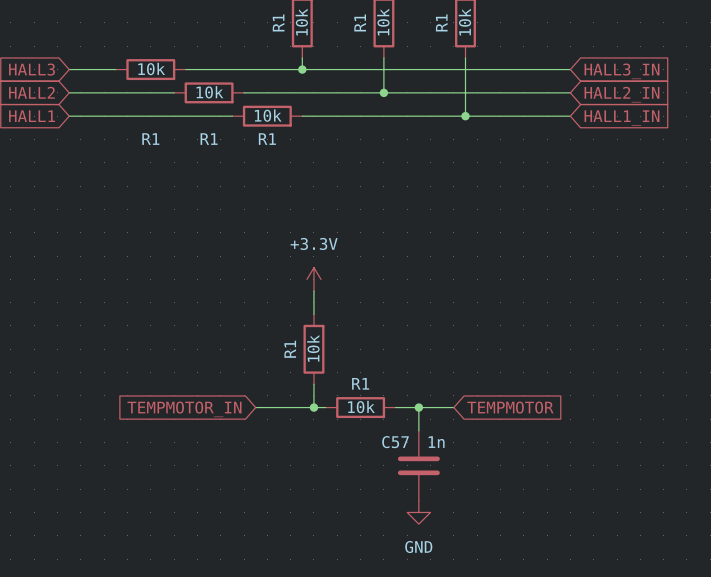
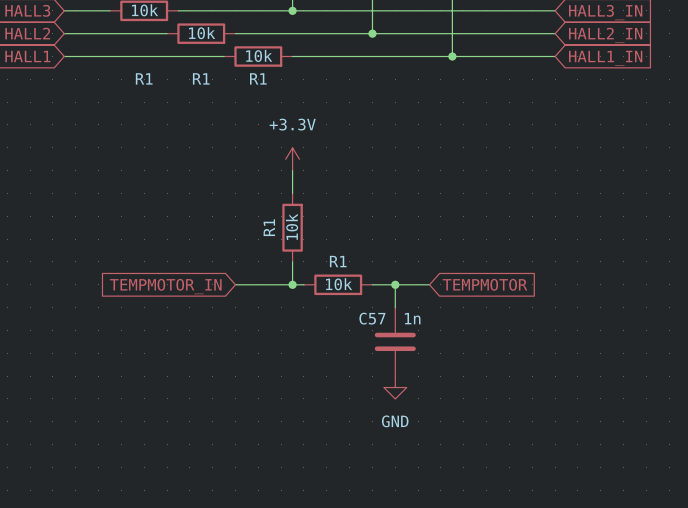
power symbol position: +3.3V (313, 279) -> +3.3V (292, 159)
R1: none -> 10k (292, 227)
wire: (313, 291) (313, 314) -> (292, 170) (292, 193)
junction: none -> (292, 284)
R1: 10k (313, 349) -> none
R1: none -> 10k (338, 284)
junction: none -> (395, 284)
wire: (313, 384) (313, 407) -> (292, 261) (292, 284)
wire: (255, 407) (325, 407) -> (235, 284) (303, 284)
junction: (313, 407) -> none
R1: 10k (360, 407) -> none
wire: (395, 407) (453, 407) -> (372, 284) (429, 284)
wire: (418, 407) (418, 430) -> (395, 284) (395, 307)
junction: (418, 407) -> none
global label position: TEMPMOTOR (510, 407) -> TEMPMOTOR (485, 284)
global label position: TEMPMOTOR_IN (184, 409) -> TEMPMOTOR_IN (165, 286)
C57 position: (418, 465) -> (395, 341)
power symbol position: GND (418, 512) -> GND (395, 387)

